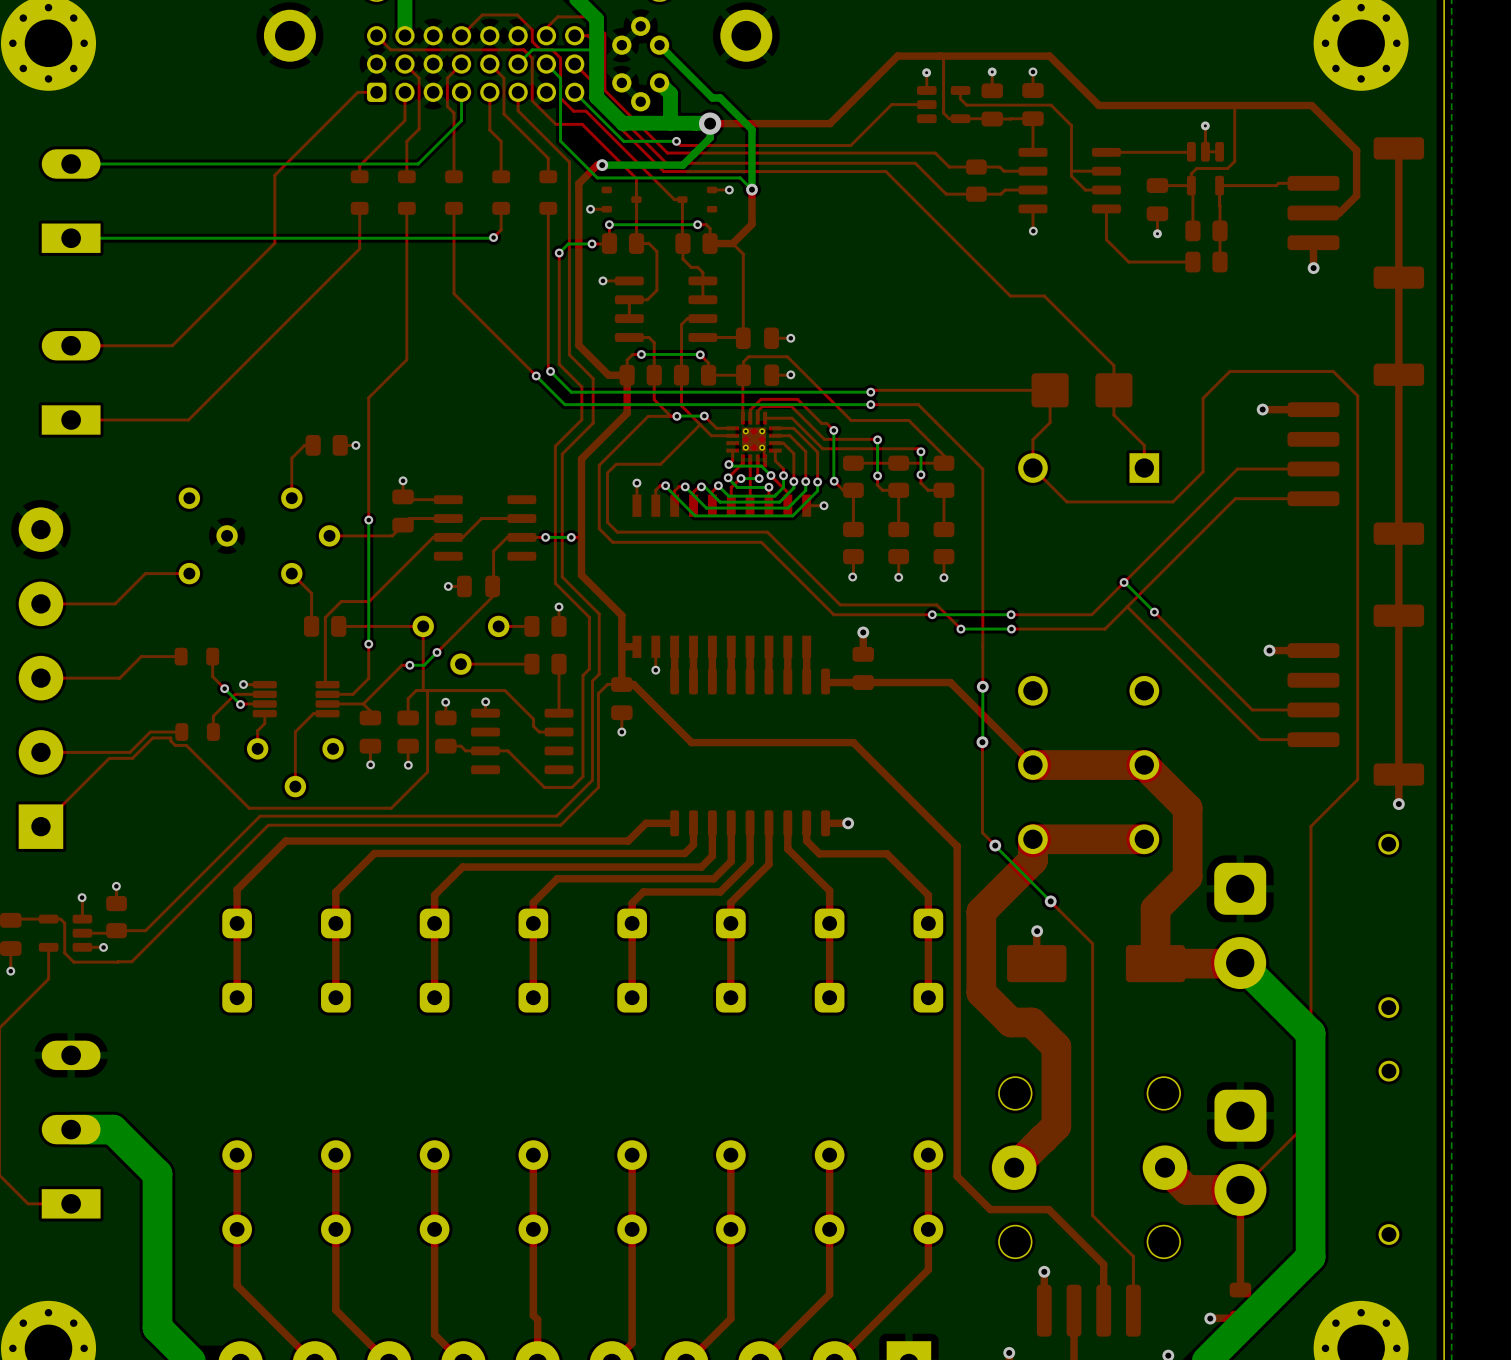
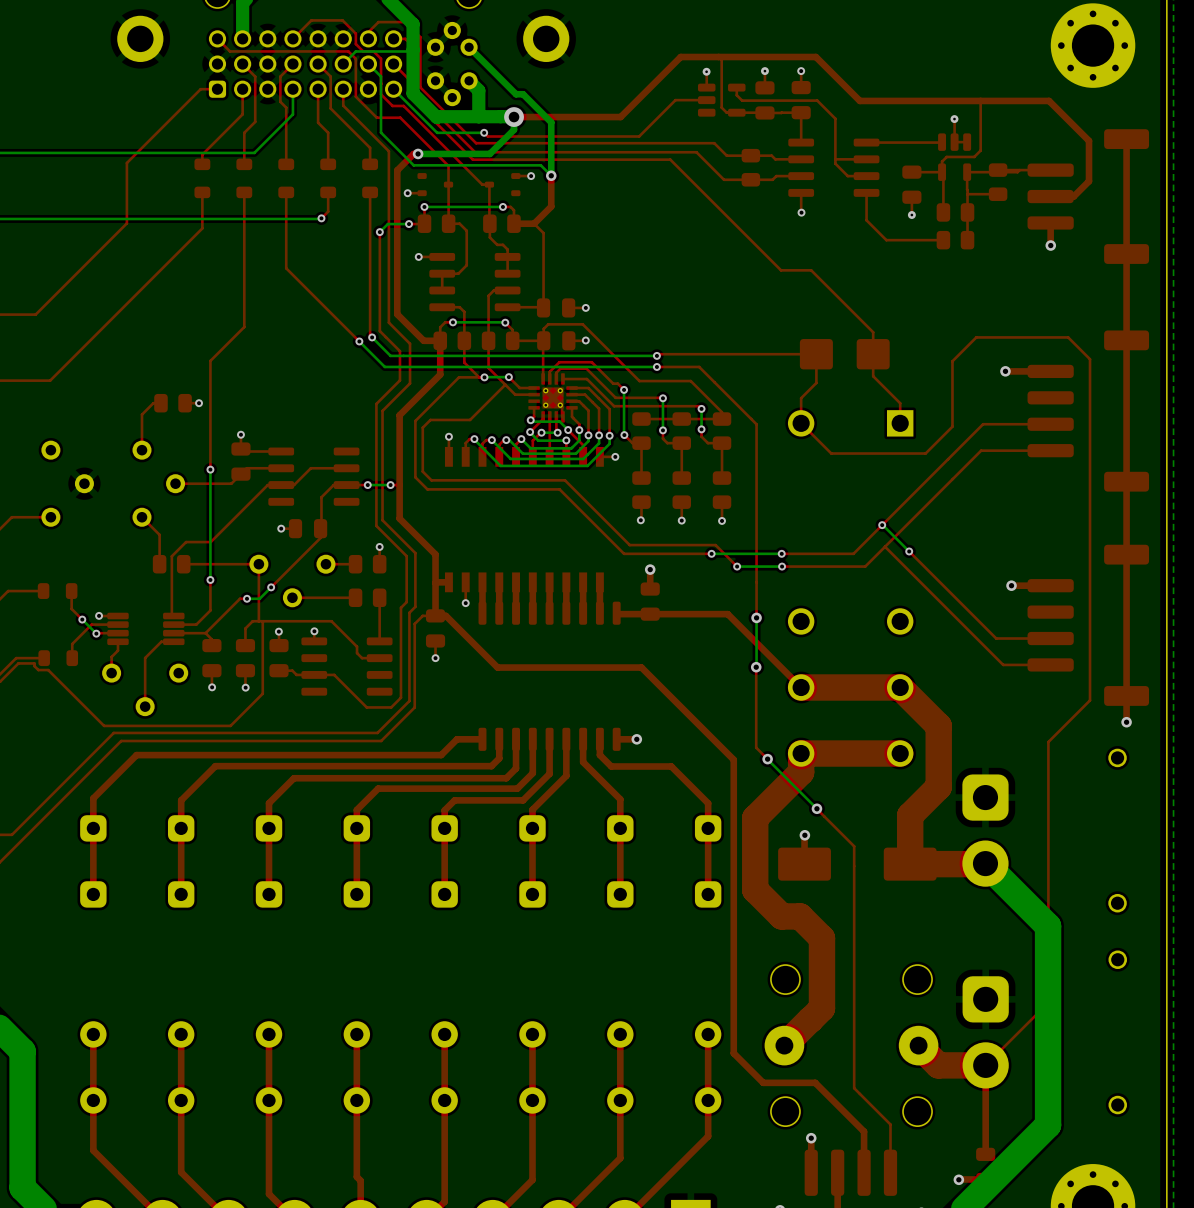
part: none -> (998, 182)
top track: none -> (998, 194) (967, 194)

